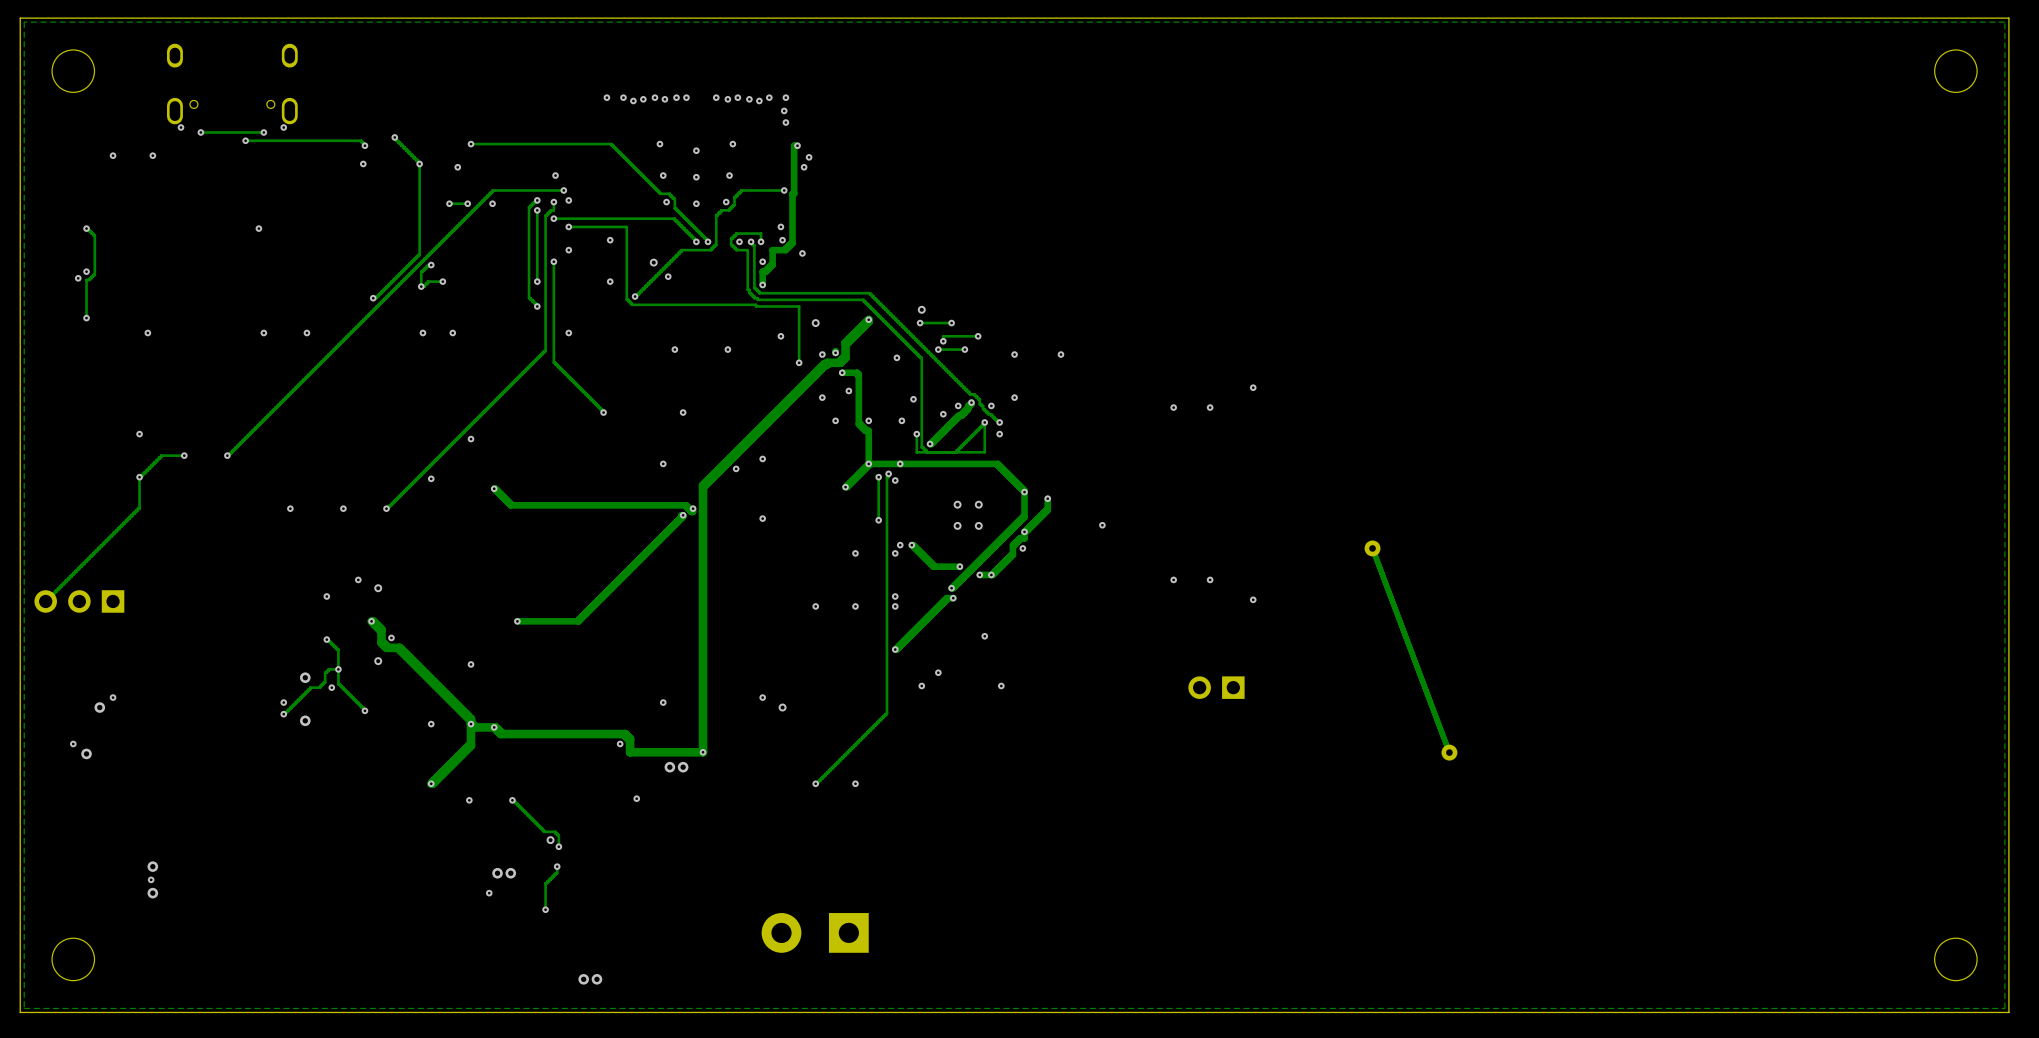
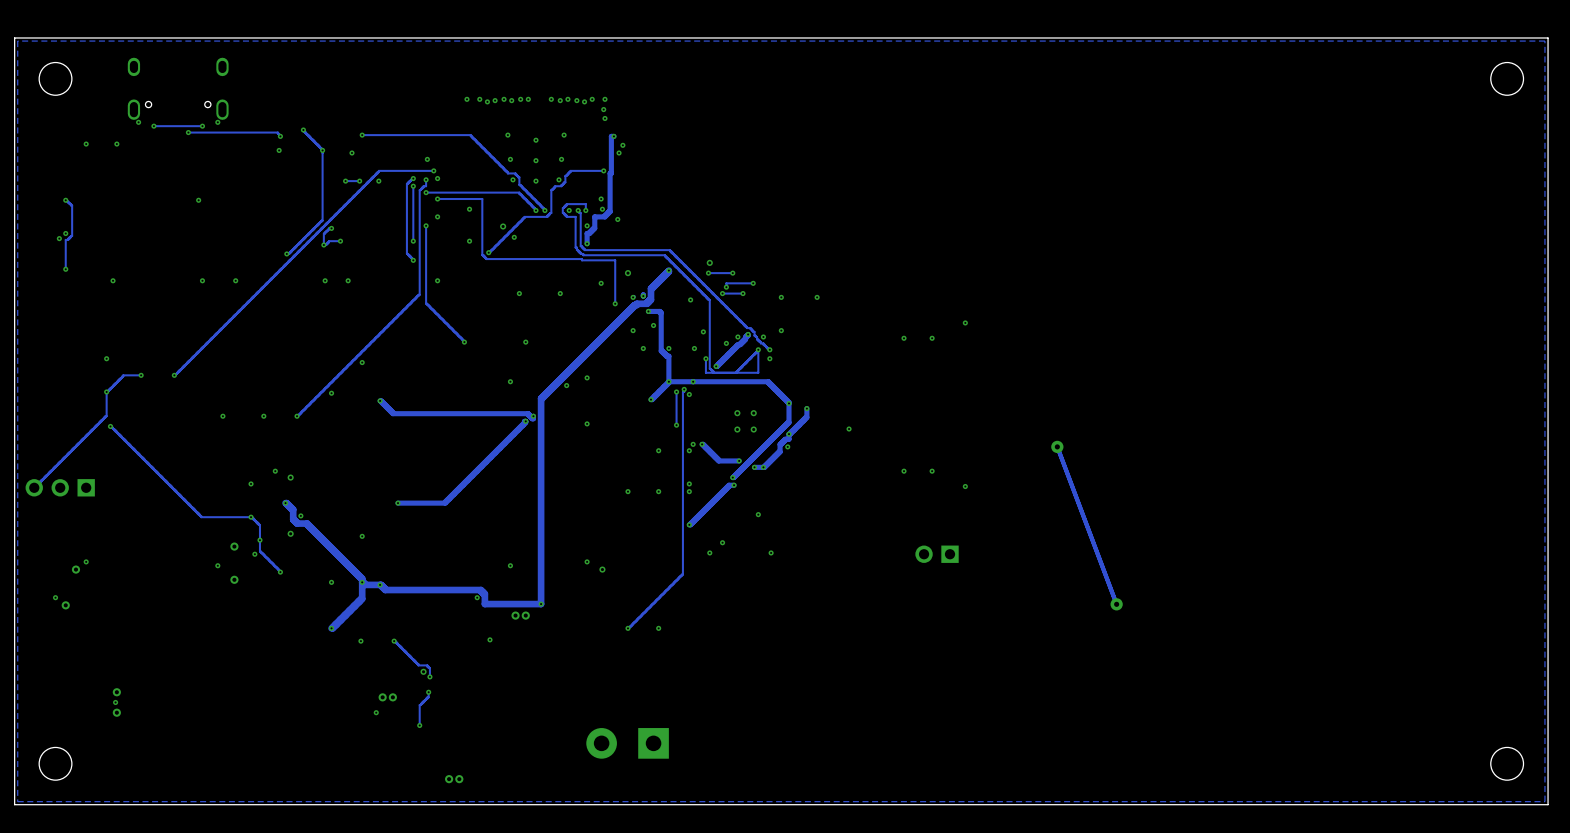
track: none -> (110, 426) (201, 517) (251, 517)
via: none -> (110, 426)
track: (338, 669) (328, 669) (325, 672) (325, 682) (320, 687) (310, 687) (283, 714) -> none
via: (283, 714) -> none

